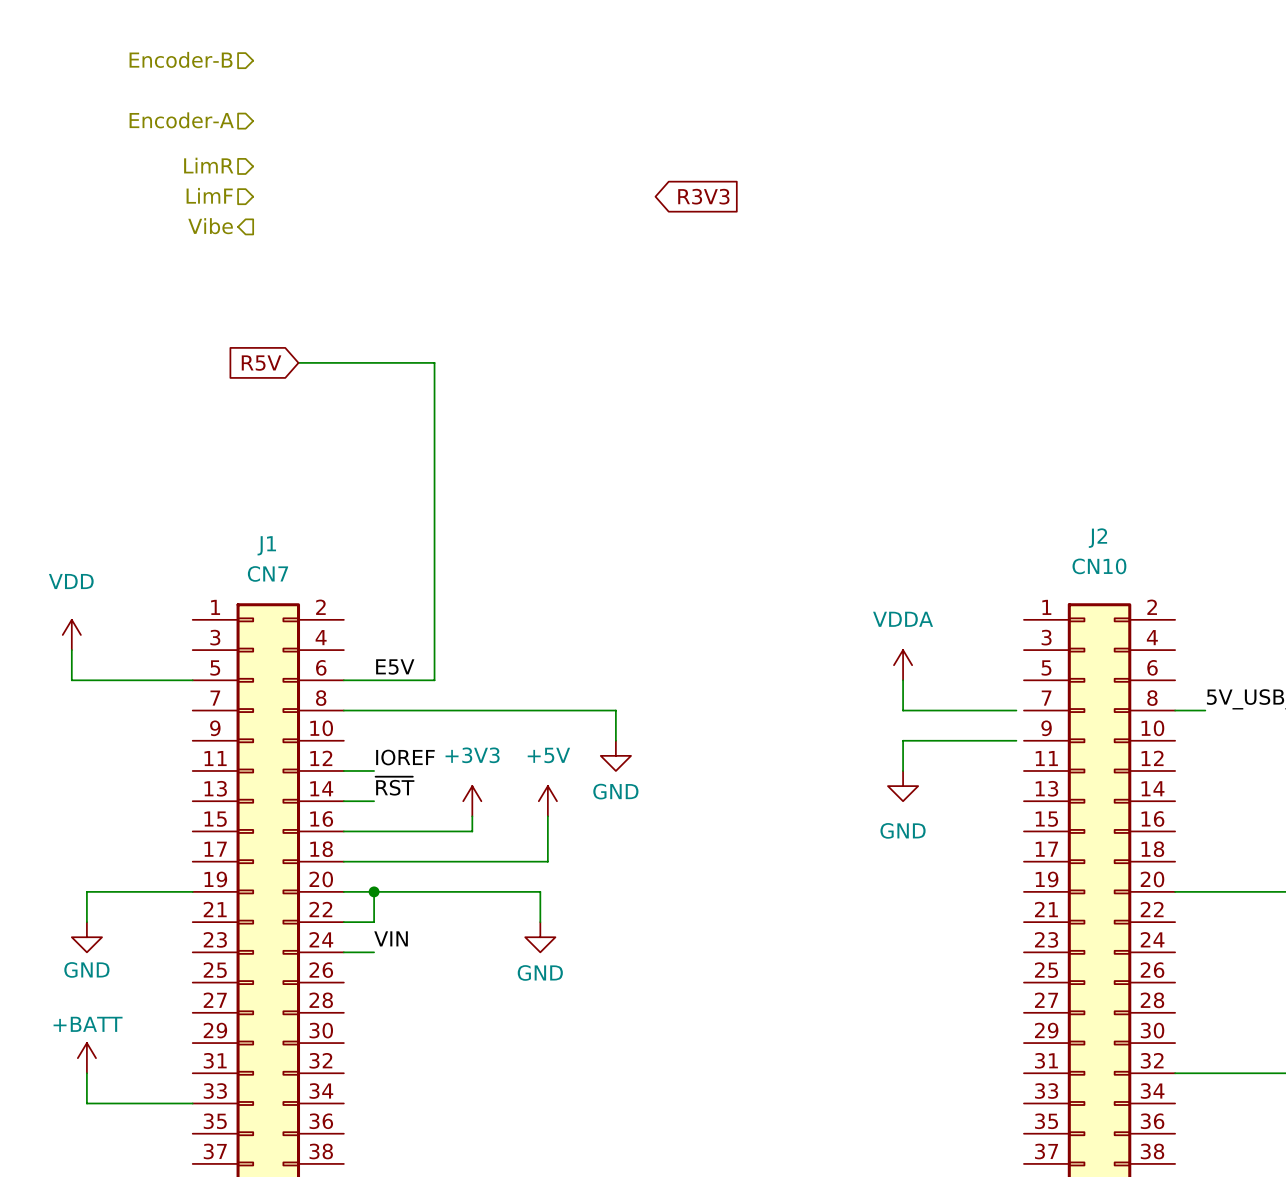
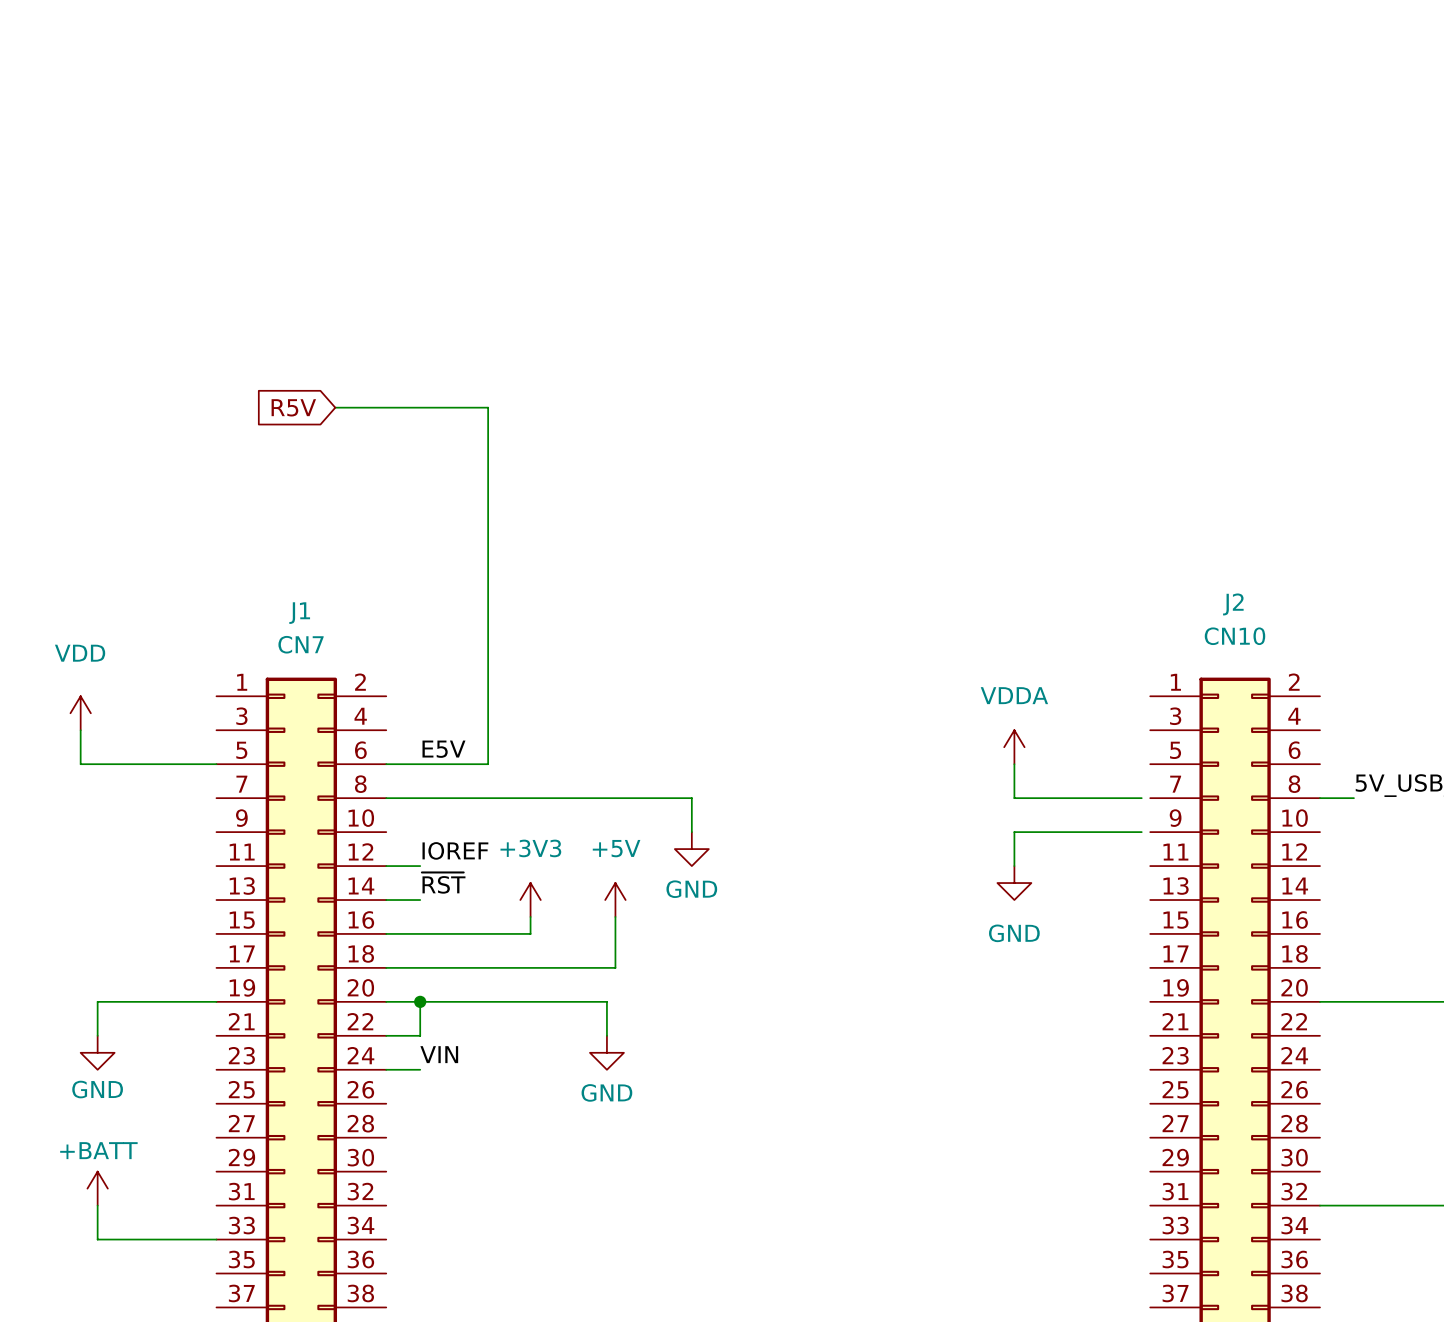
hierarchical label: Encoder-B (181, 59) -> none
hierarchical label: Encoder-A (181, 120) -> none
hierarchical label: LimR (208, 165) -> none
hierarchical label: LimF (209, 195) -> none
global label: R3V3 (703, 196) -> none
hierarchical label: Vibe (210, 226) -> none

